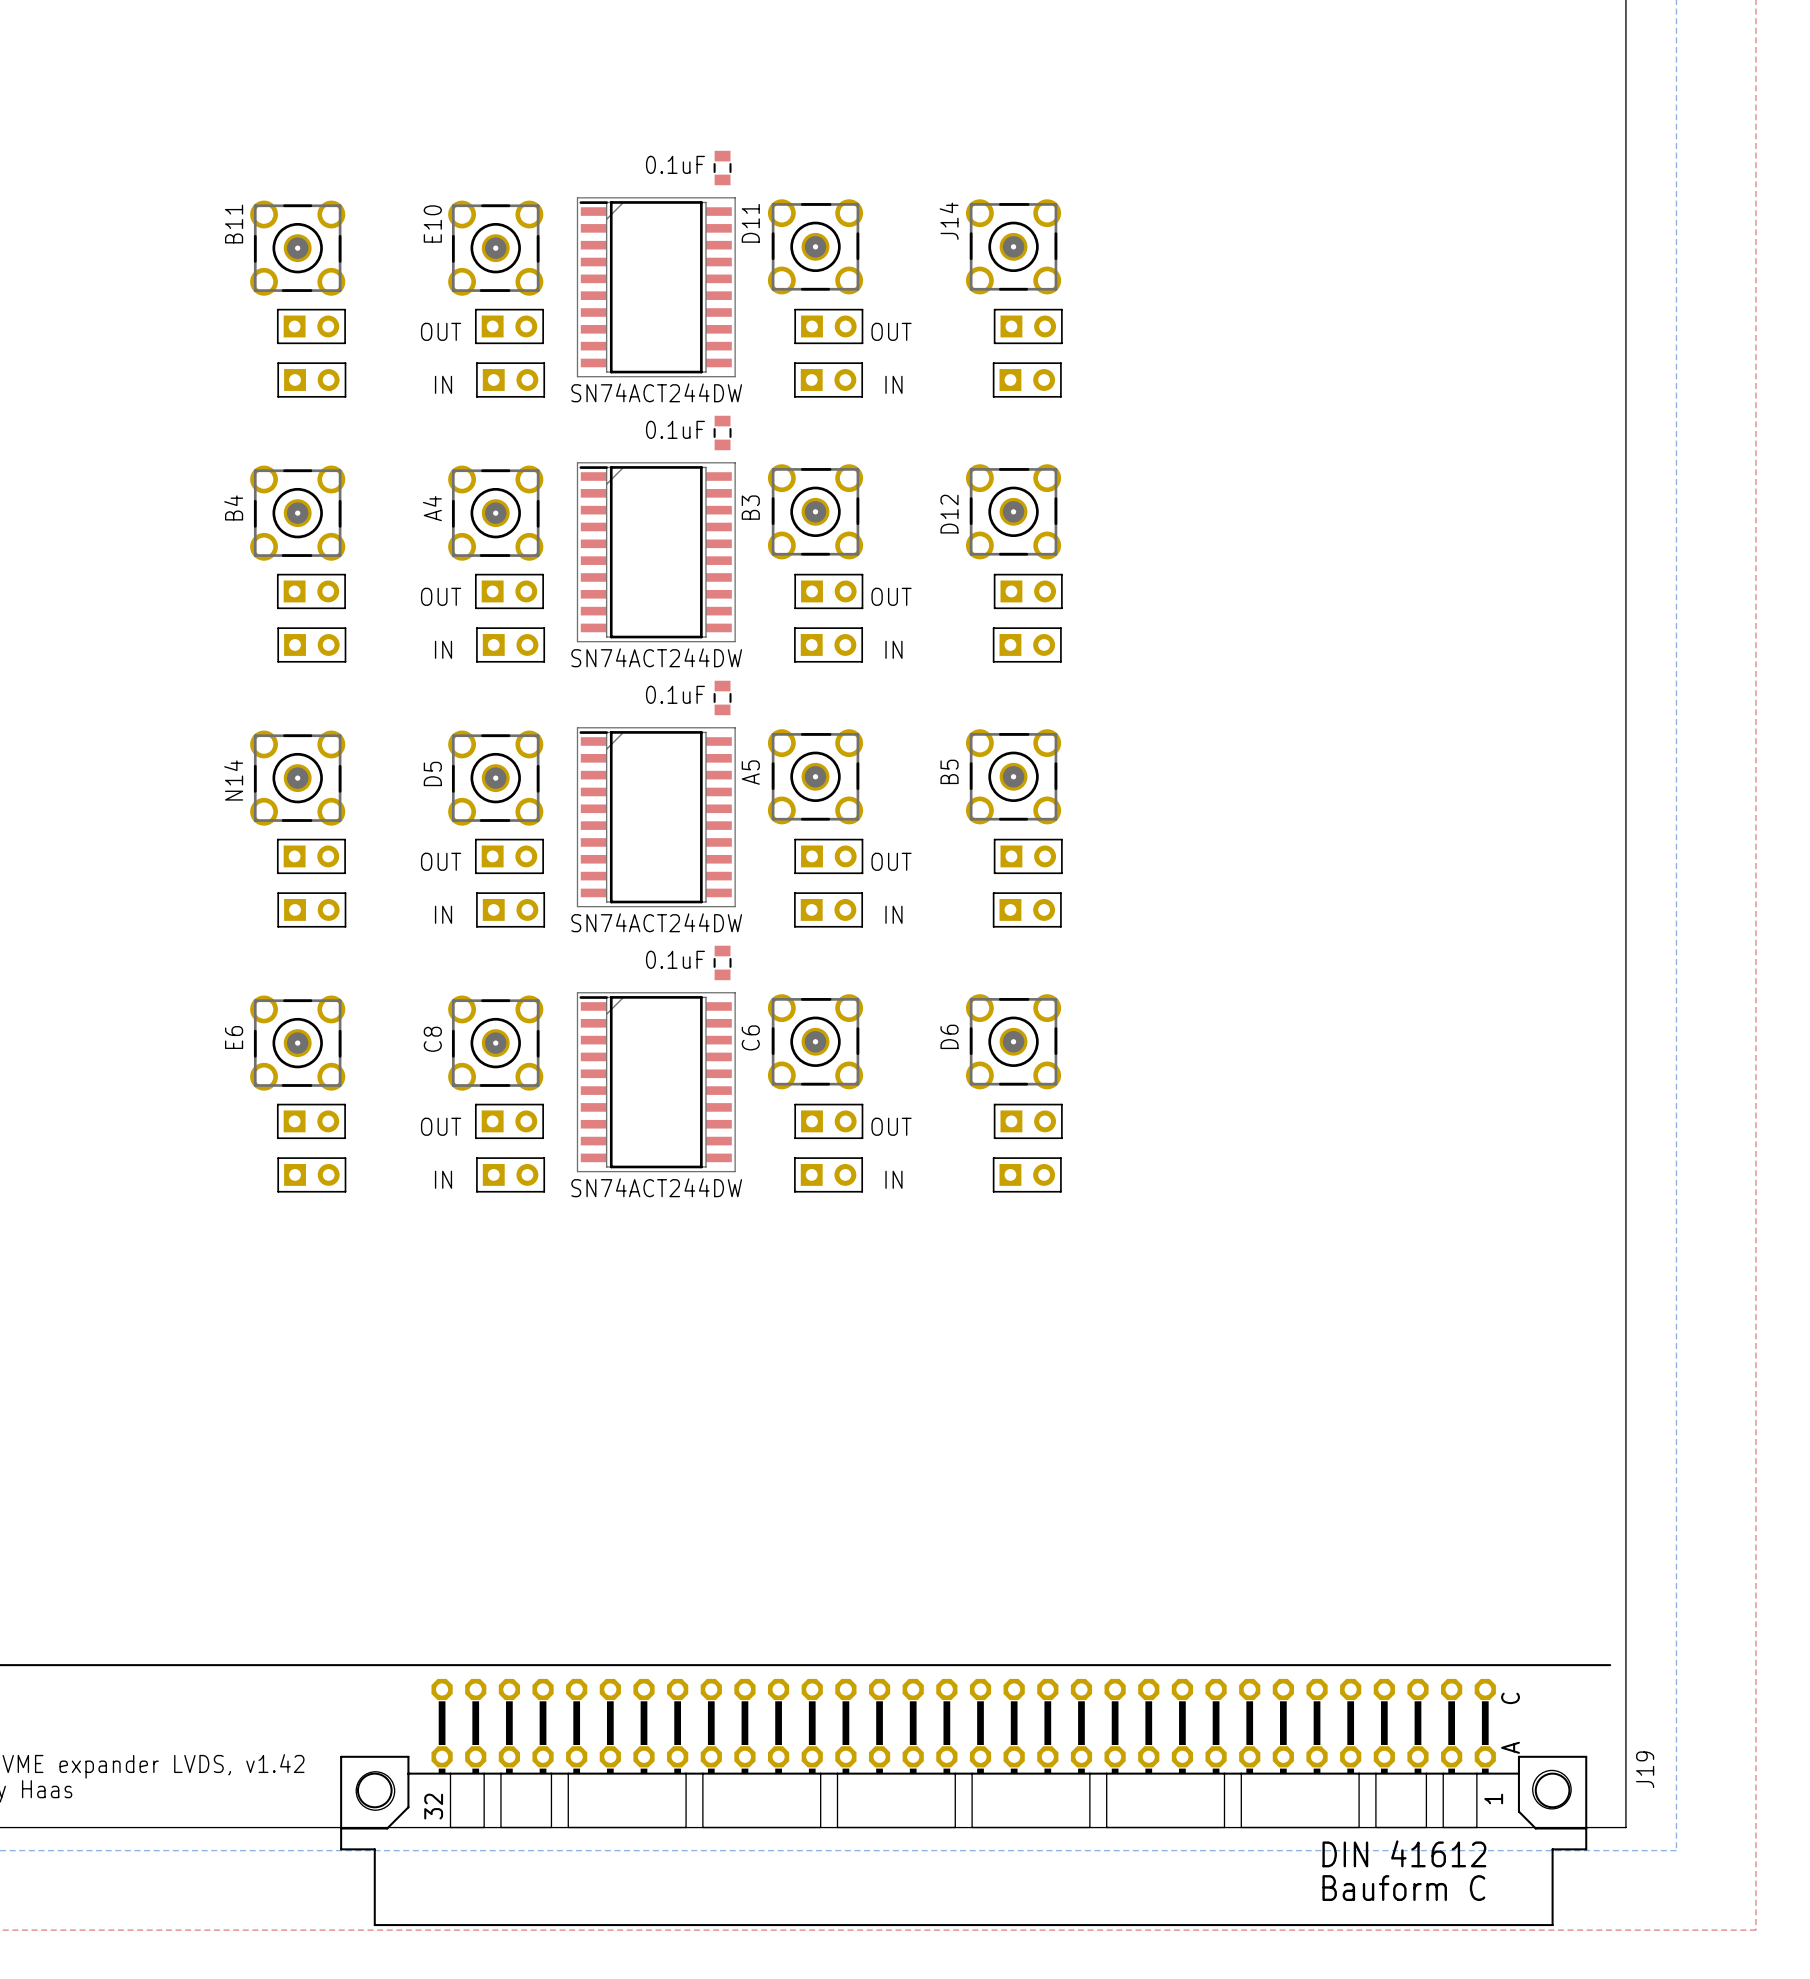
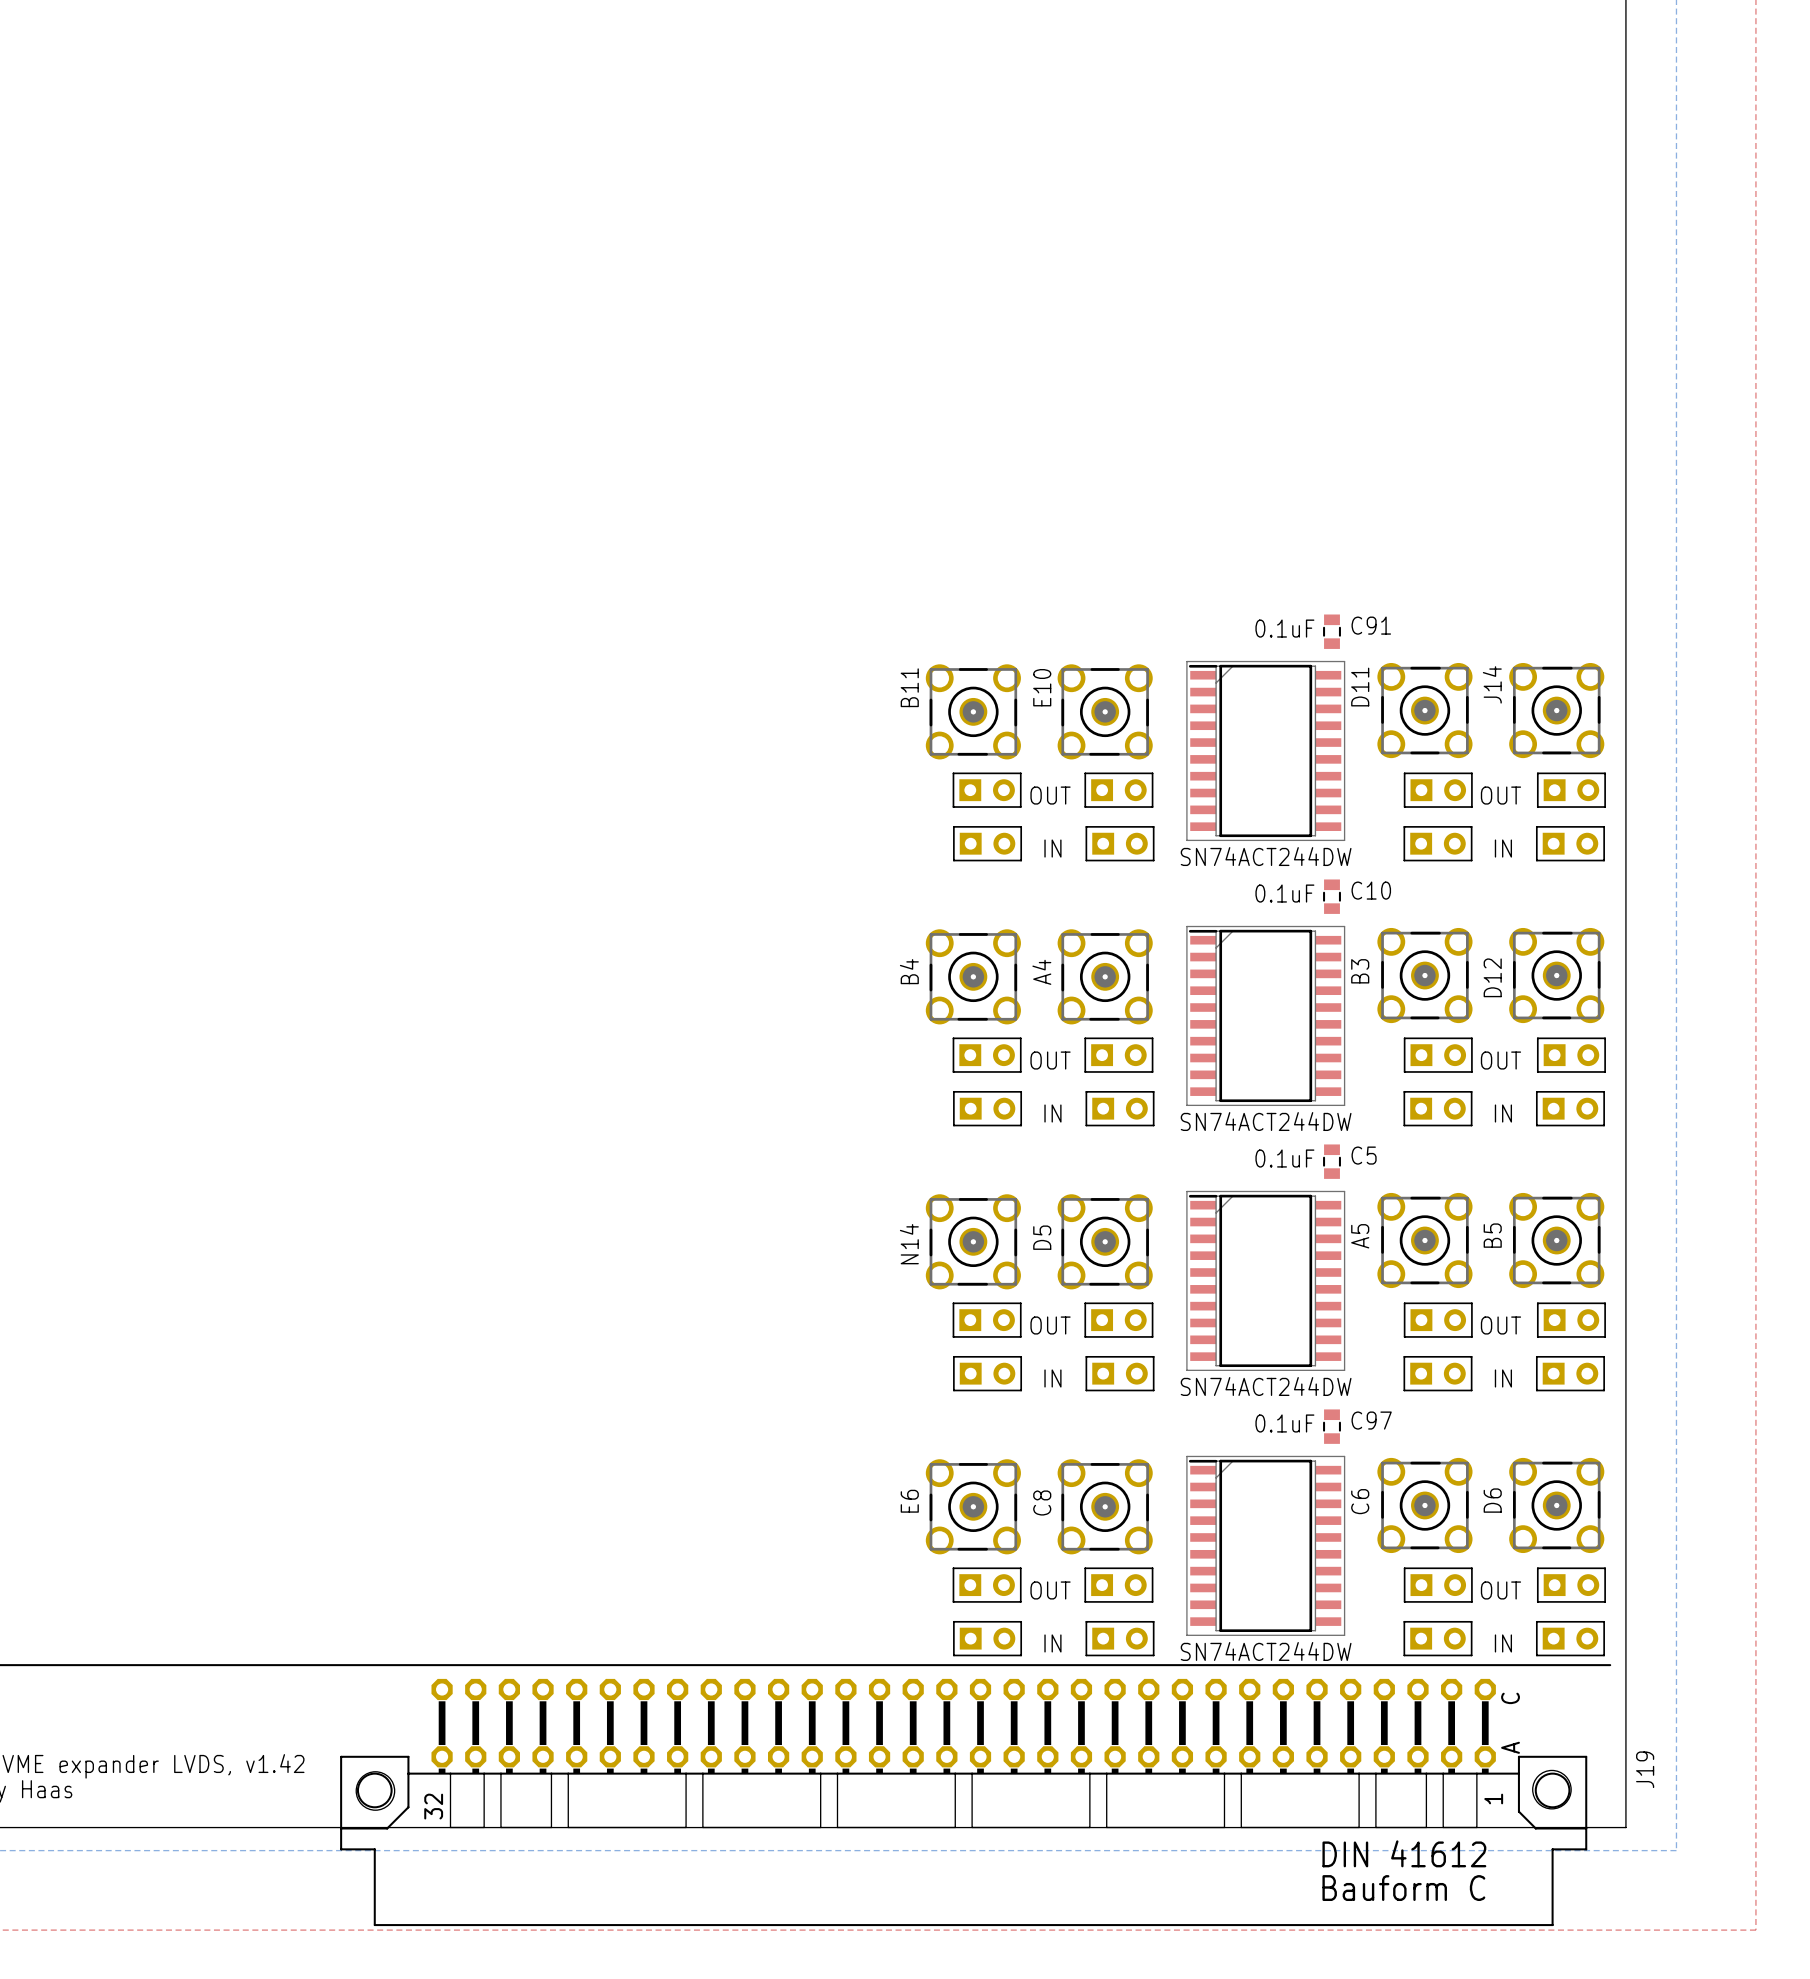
part: 0.1uF (722, 168) -> none
D11 position: (815, 246) -> (1424, 710)
J14 position: (1013, 246) -> (1556, 710)
B11 position: (297, 248) -> (973, 711)
E10 position: (495, 248) -> (1105, 711)
part: SN74ACT244DW (656, 287) -> none
part: (311, 326) -> none
part: (509, 326) -> none
part: (828, 326) -> none
part: (1028, 326) -> none
text: OUT (441, 331) -> none
text: OUT (891, 331) -> none
part: (311, 380) -> none
part: (510, 380) -> none
part: (828, 380) -> none
part: (1027, 380) -> none
text: IN (443, 384) -> none
text: IN (893, 384) -> none
part: 0.1uF (722, 432) -> none
B3 position: (815, 511) -> (1424, 975)
D12 position: (1013, 511) -> (1556, 975)
B4 position: (297, 513) -> (973, 976)
A4 position: (495, 513) -> (1105, 976)
part: SN74ACT244DW (656, 552) -> none
part: (311, 591) -> none
part: (509, 591) -> none
part: (828, 591) -> none
part: (1028, 591) -> none
text: OUT (441, 596) -> none
text: OUT (891, 596) -> none
C91: none -> 0.1uF (1332, 631)
part: (311, 644) -> none
part: (510, 644) -> none
part: (828, 644) -> none
part: (1027, 644) -> none
text: IN (443, 649) -> none
text: IN (893, 649) -> none
part: 0.1uF (722, 697) -> none
part: none -> SN74ACT244DW (1265, 750)
A5 position: (815, 776) -> (1424, 1240)
B5 position: (1013, 776) -> (1556, 1240)
N14 position: (297, 778) -> (973, 1241)
D5 position: (495, 778) -> (1105, 1241)
part: none -> (987, 790)
part: none -> (1118, 790)
part: none -> (1438, 790)
part: none -> (1571, 790)
text: none -> OUT (1050, 795)
text: none -> OUT (1500, 795)
part: SN74ACT244DW (656, 817) -> none
part: none -> (987, 843)
part: none -> (1120, 843)
part: none -> (1437, 843)
part: none -> (1570, 843)
text: none -> IN (1052, 848)
text: none -> IN (1503, 848)
part: (311, 856) -> none
part: (509, 856) -> none
part: (828, 856) -> none
part: (1028, 856) -> none
text: OUT (441, 861) -> none
text: OUT (891, 861) -> none
C10: none -> 0.1uF (1332, 896)
part: (311, 909) -> none
part: (510, 909) -> none
part: (828, 909) -> none
part: (1027, 909) -> none
text: IN (443, 914) -> none
text: IN (893, 914) -> none
part: 0.1uF (722, 962) -> none
part: none -> SN74ACT244DW (1265, 1015)
C6 position: (815, 1041) -> (1424, 1505)
D6 position: (1013, 1041) -> (1556, 1505)
E6 position: (297, 1043) -> (973, 1506)
C8 position: (495, 1043) -> (1105, 1506)
part: none -> (987, 1055)
part: none -> (1118, 1055)
part: none -> (1438, 1055)
part: none -> (1571, 1055)
text: none -> OUT (1050, 1060)
text: none -> OUT (1500, 1060)
part: SN74ACT244DW (656, 1082) -> none
part: none -> (987, 1108)
part: none -> (1120, 1108)
part: none -> (1437, 1108)
part: none -> (1570, 1108)
text: none -> IN (1052, 1113)
text: none -> IN (1503, 1113)
part: (311, 1121) -> none
part: (509, 1121) -> none
part: (828, 1121) -> none
part: (1028, 1121) -> none
text: OUT (441, 1126) -> none
text: OUT (891, 1126) -> none
C5: none -> 0.1uF (1332, 1161)
part: (311, 1174) -> none
part: (510, 1174) -> none
part: (828, 1174) -> none
part: (1027, 1174) -> none
text: IN (443, 1179) -> none
text: IN (893, 1179) -> none
part: none -> SN74ACT244DW (1265, 1280)
part: none -> (987, 1320)
part: none -> (1118, 1320)
part: none -> (1438, 1320)
part: none -> (1571, 1320)
text: none -> OUT (1050, 1325)
text: none -> OUT (1500, 1325)
part: none -> (987, 1373)
part: none -> (1120, 1373)
part: none -> (1437, 1373)
part: none -> (1570, 1373)
text: none -> IN (1052, 1378)
text: none -> IN (1503, 1378)
C97: none -> 0.1uF (1332, 1426)
part: none -> SN74ACT244DW (1265, 1545)
part: none -> (987, 1585)
part: none -> (1118, 1585)
part: none -> (1438, 1585)
part: none -> (1571, 1585)
text: none -> OUT (1050, 1590)
text: none -> OUT (1500, 1590)
part: none -> (987, 1638)
part: none -> (1120, 1638)
part: none -> (1437, 1638)
part: none -> (1570, 1638)
text: none -> IN (1052, 1643)
text: none -> IN (1503, 1643)

